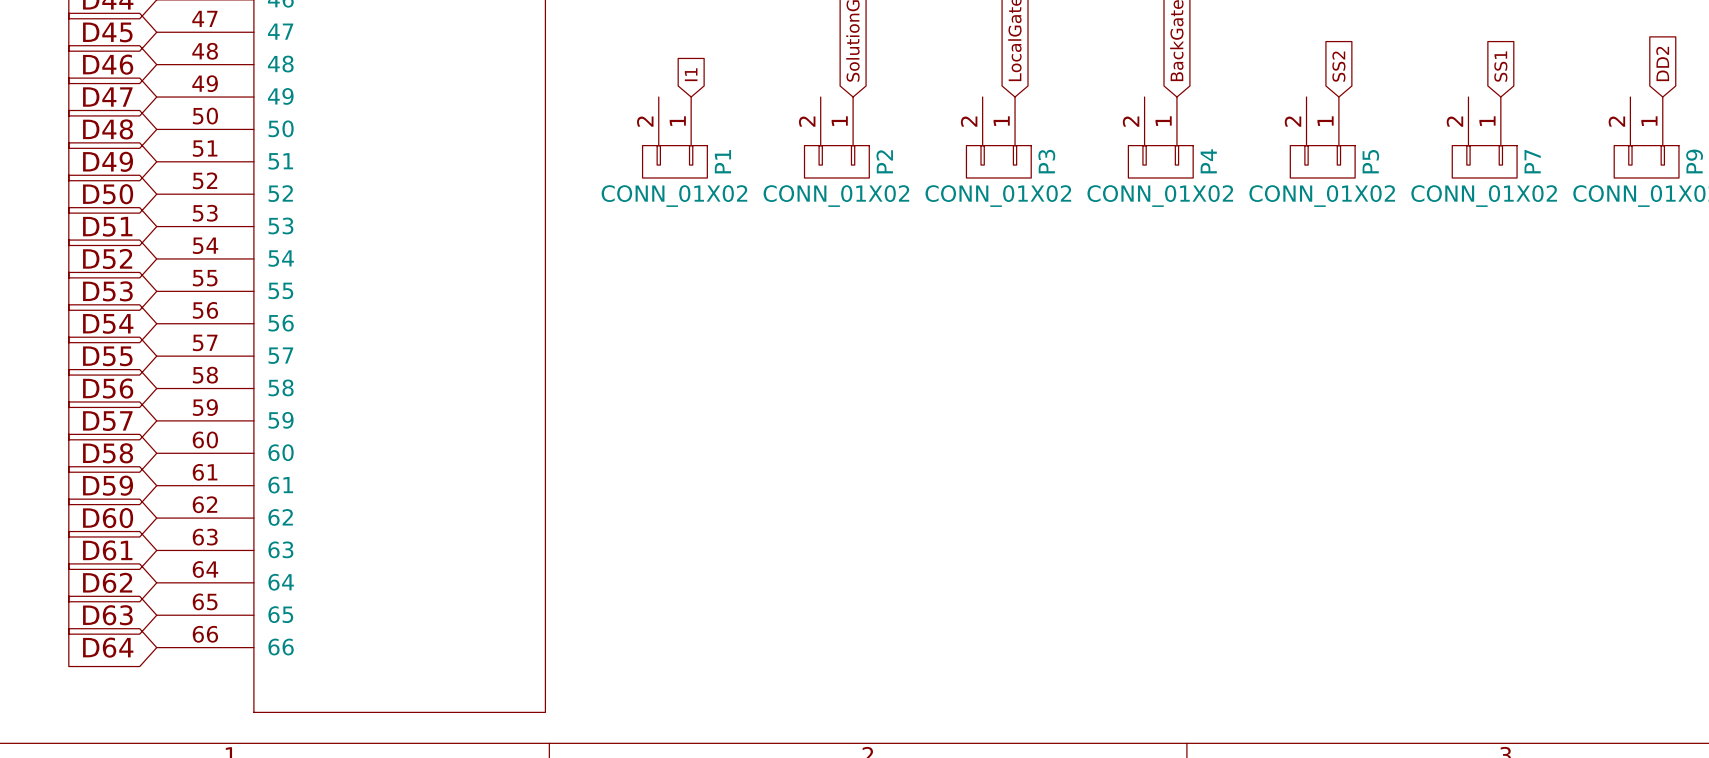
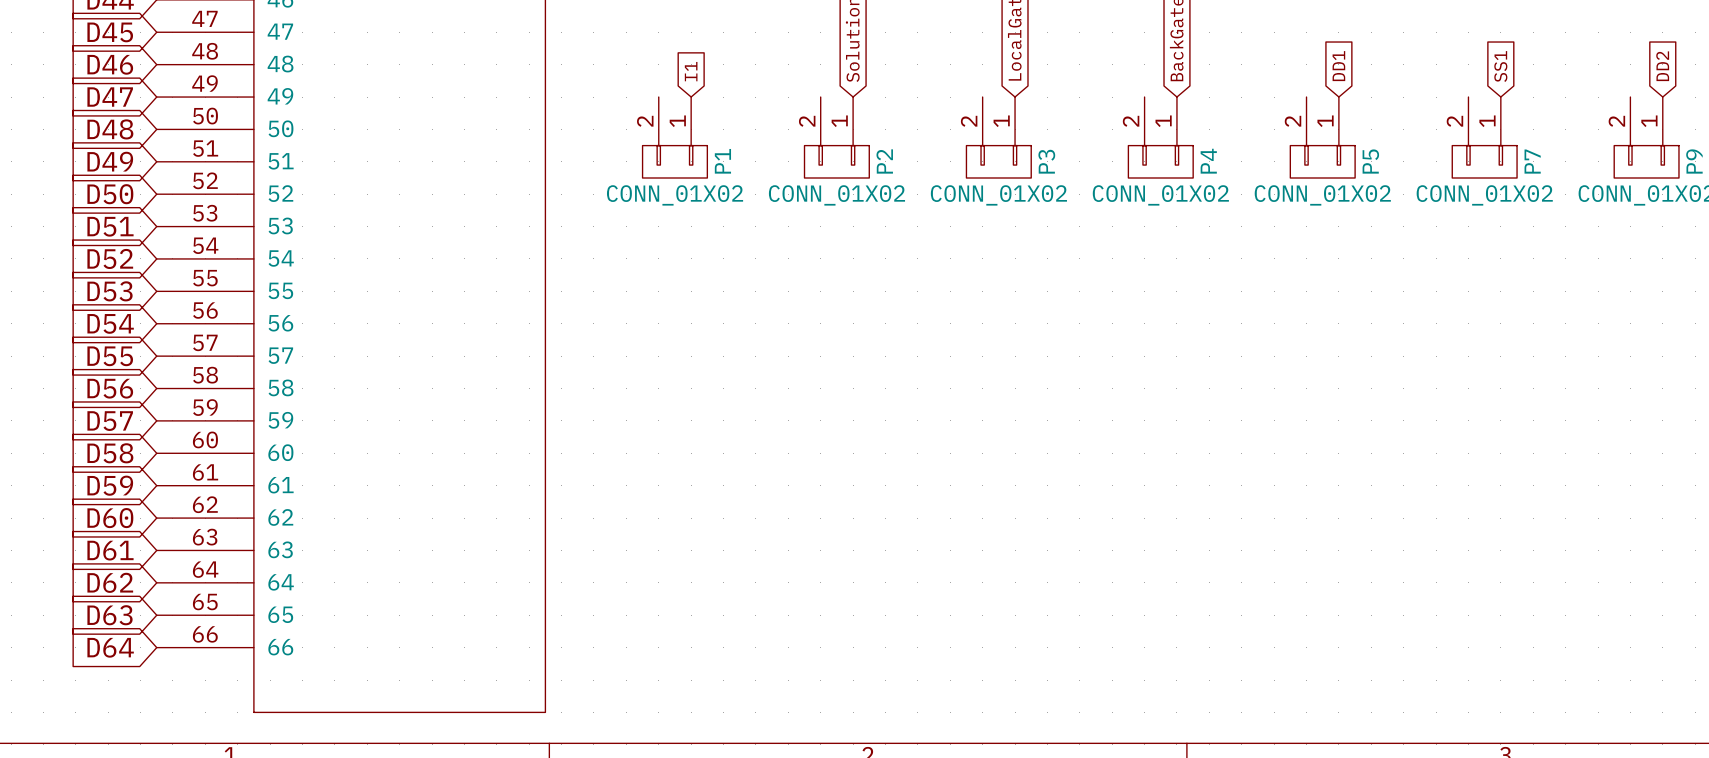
global label: SS2 (1338, 66) -> DD1 (1338, 66)

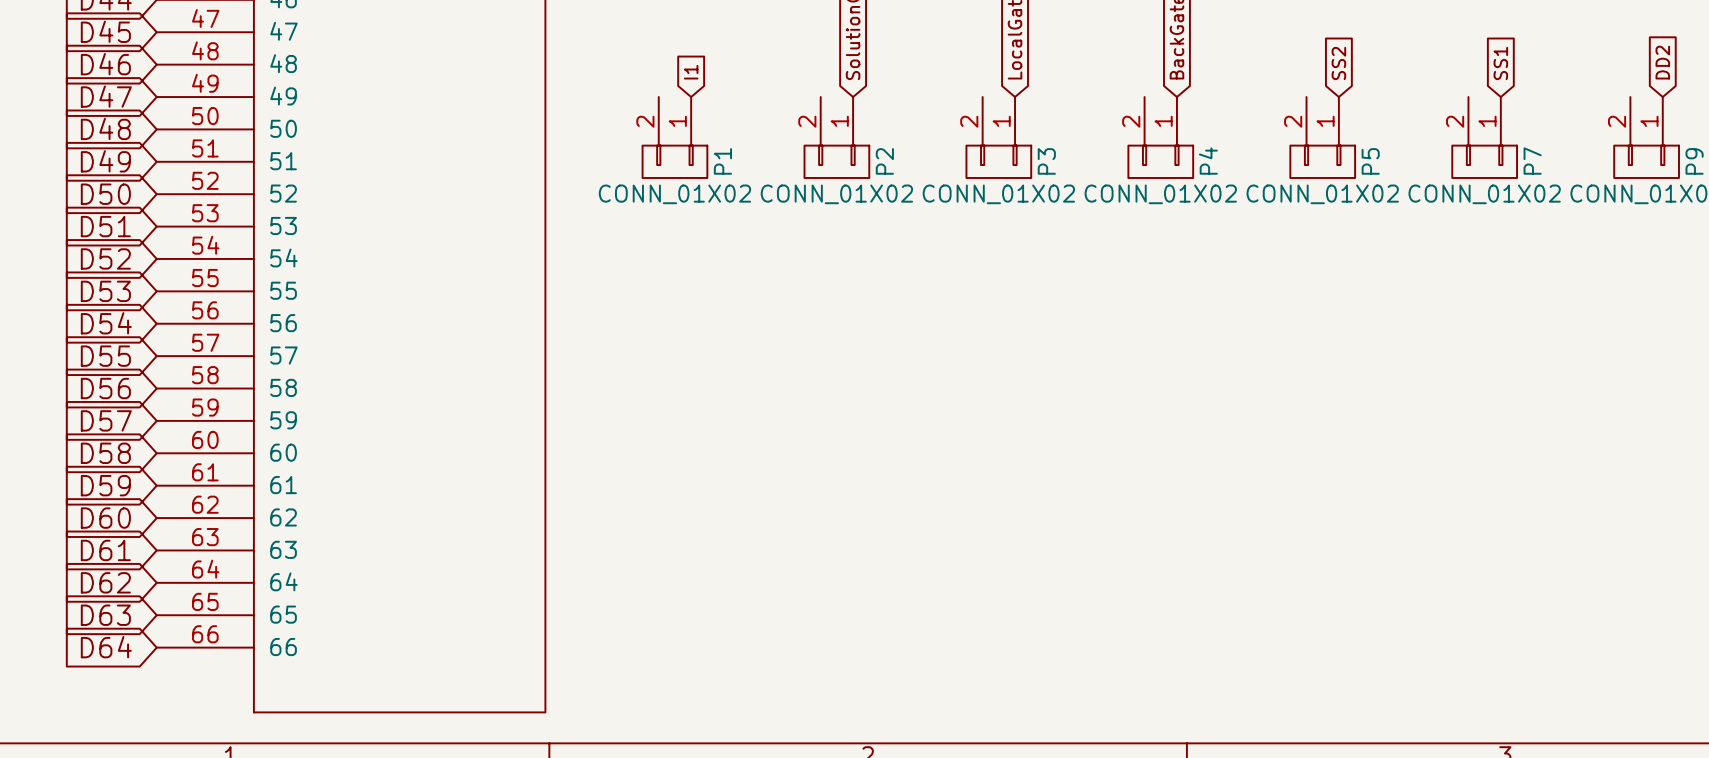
global label: DD1 (1338, 66) -> SS2 (1338, 63)

